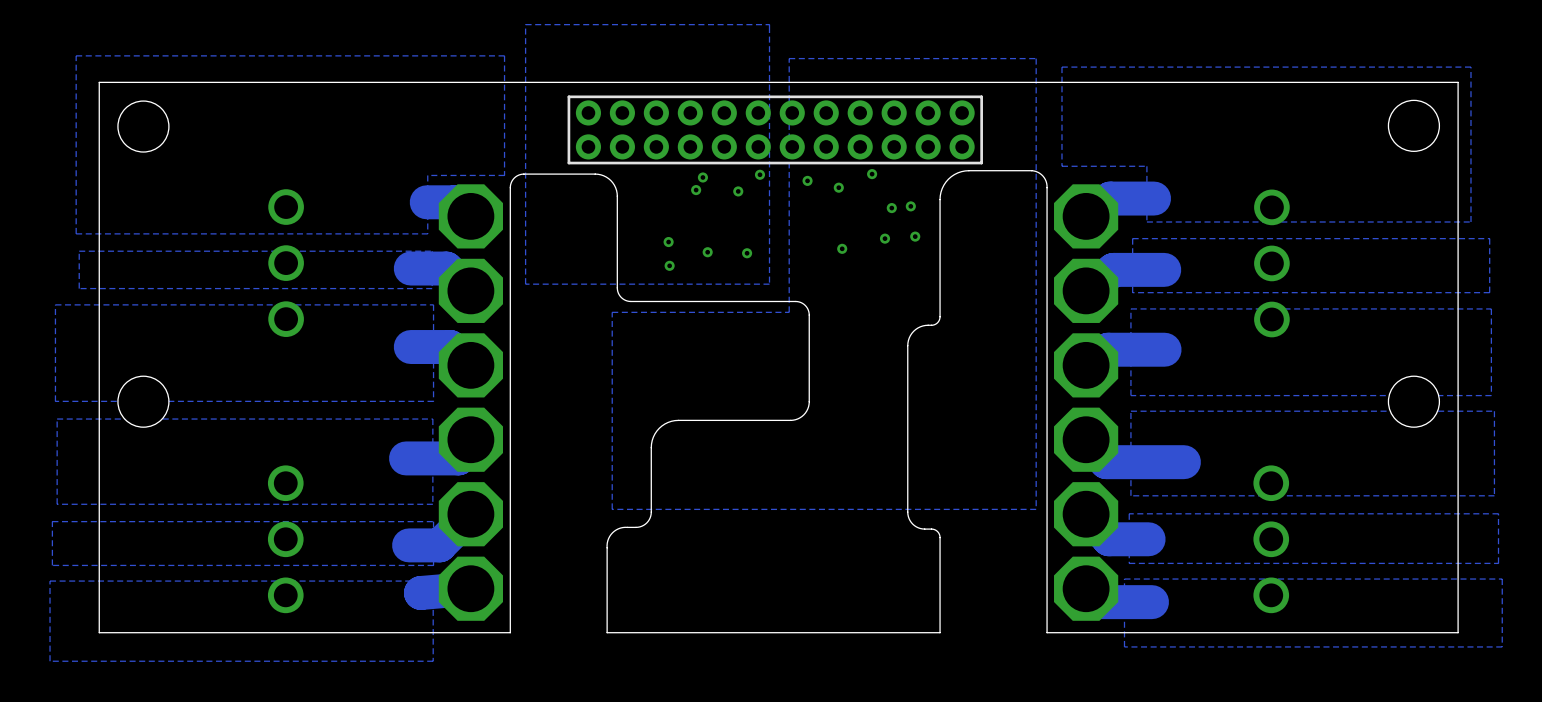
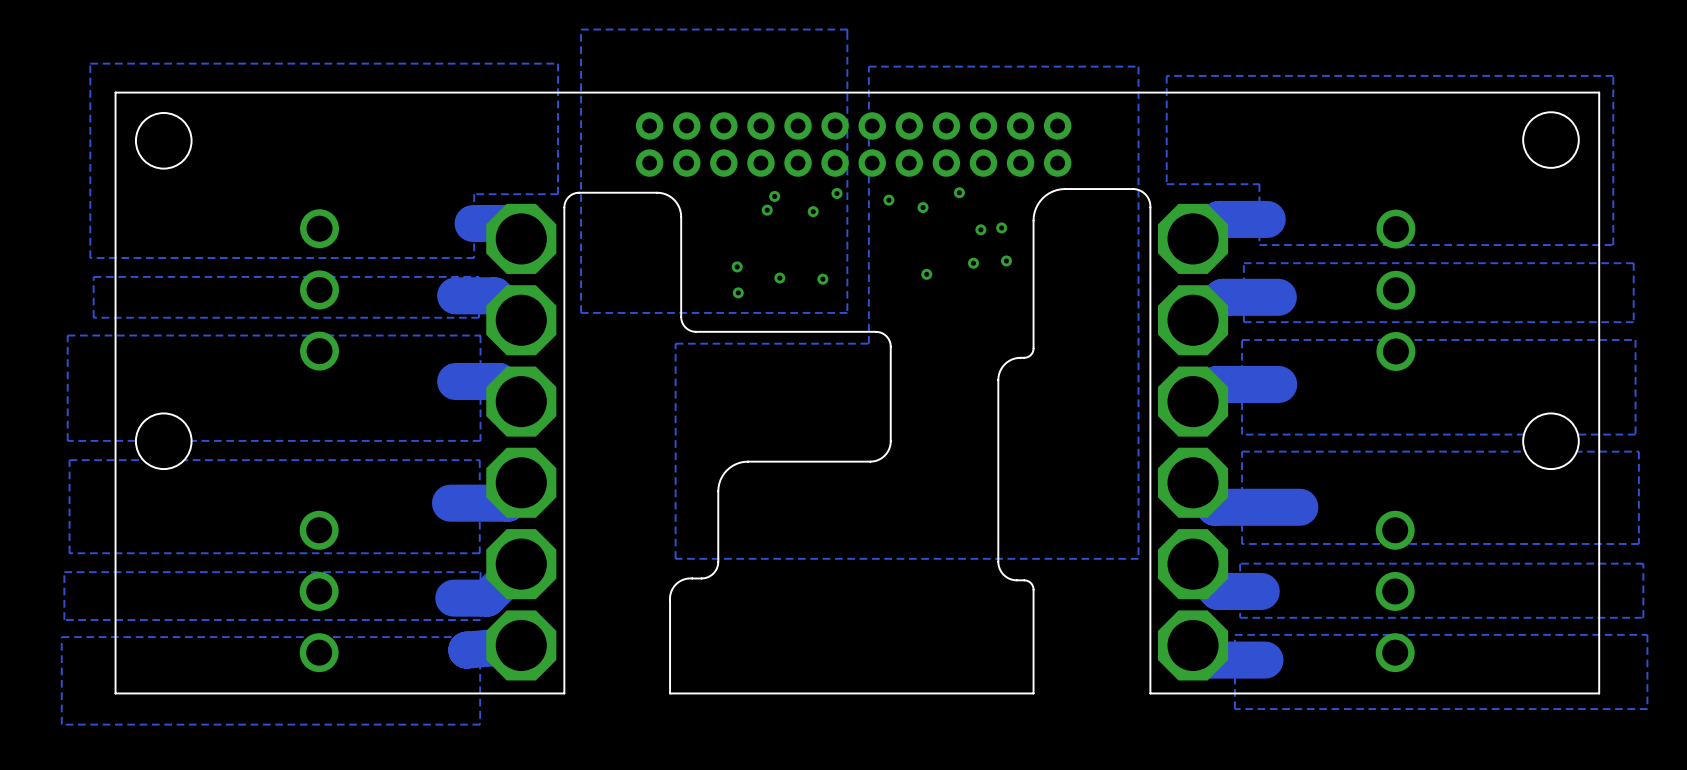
part footprint: [567, 95, 983, 165] -> [635, 112, 1072, 177]

